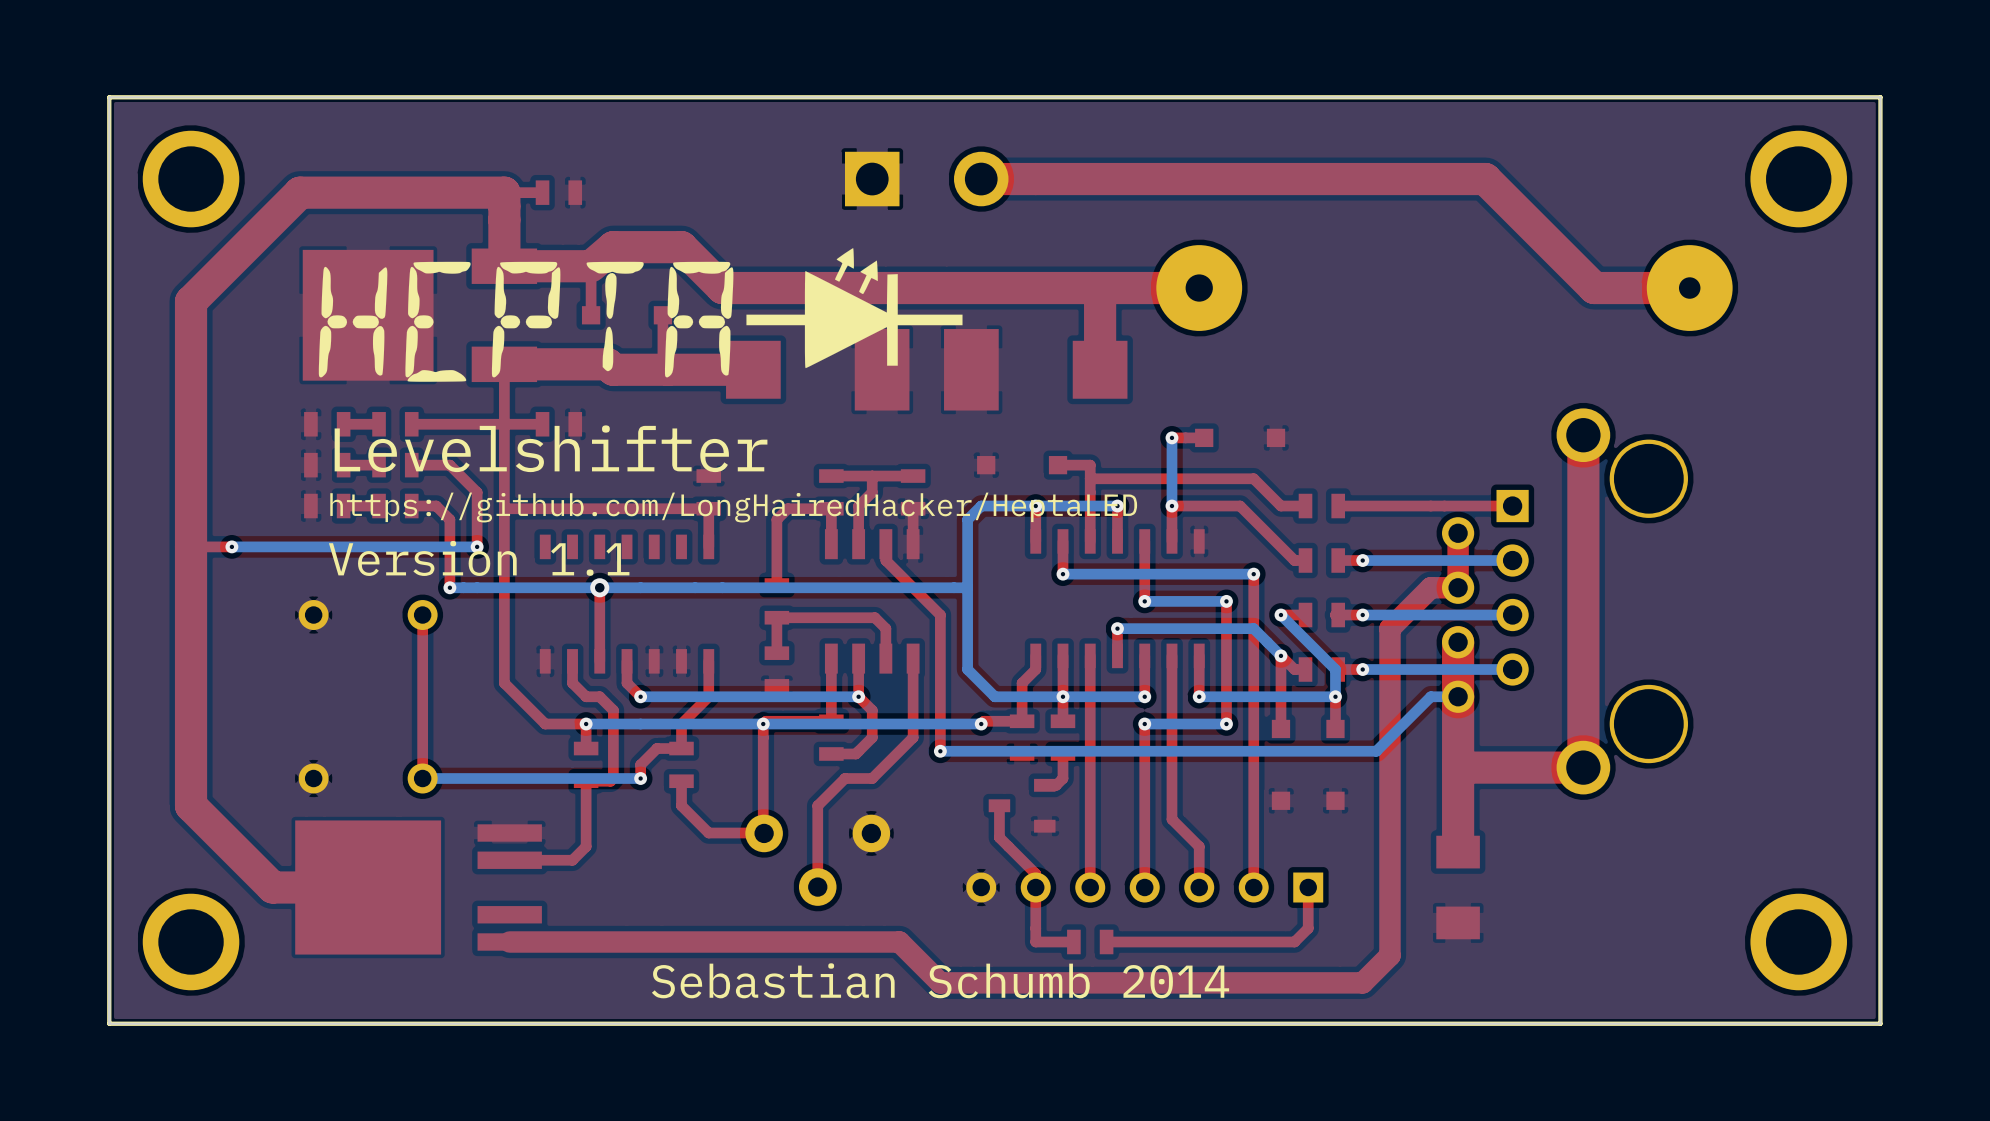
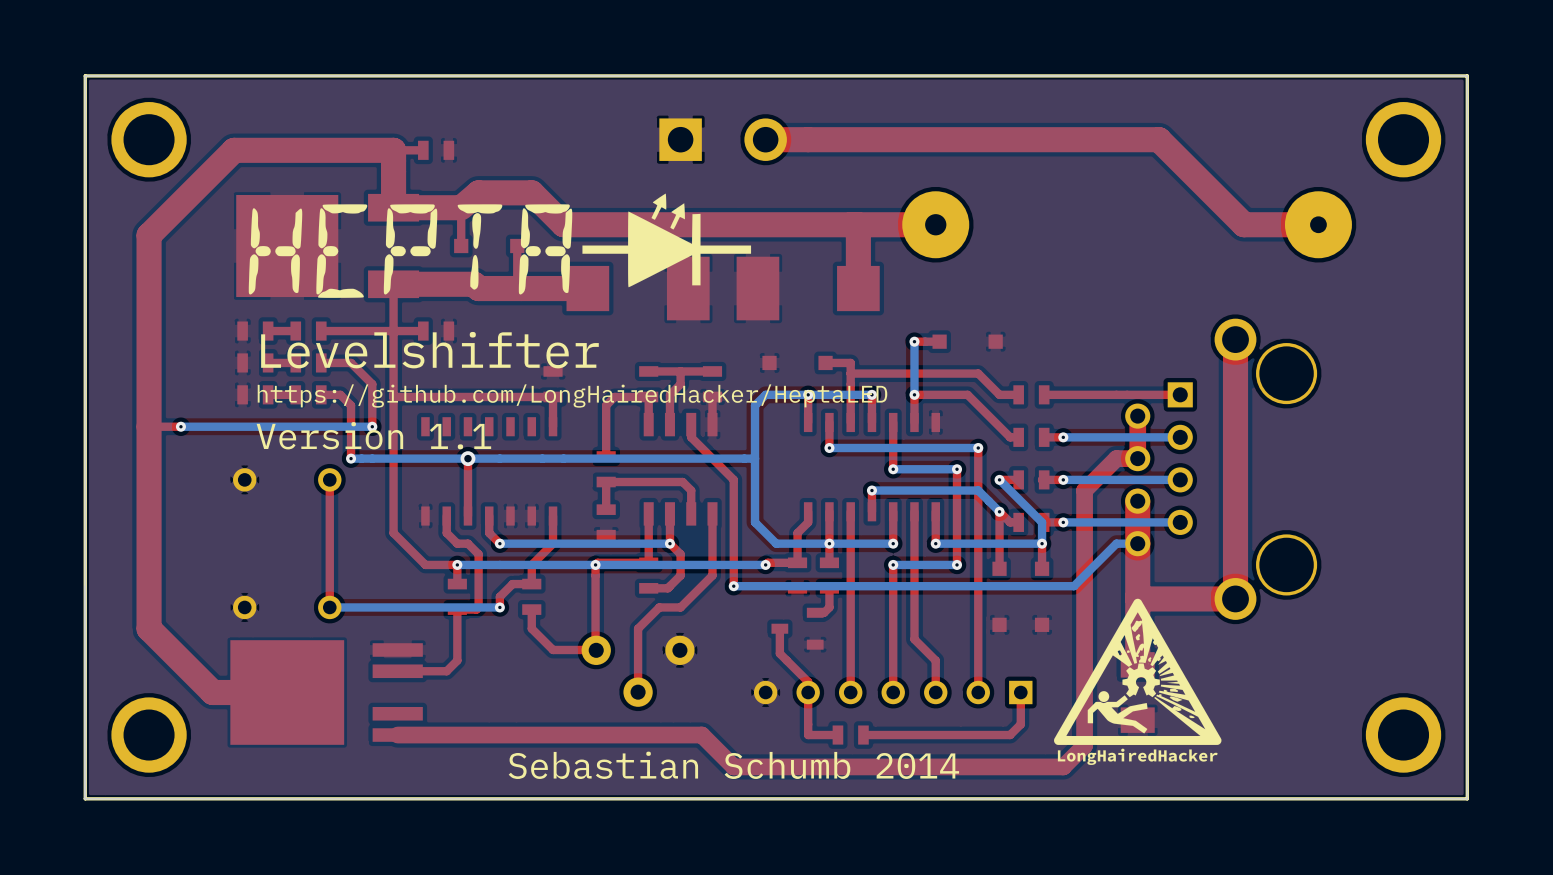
drawing: none -> [1054, 598, 1222, 765]

